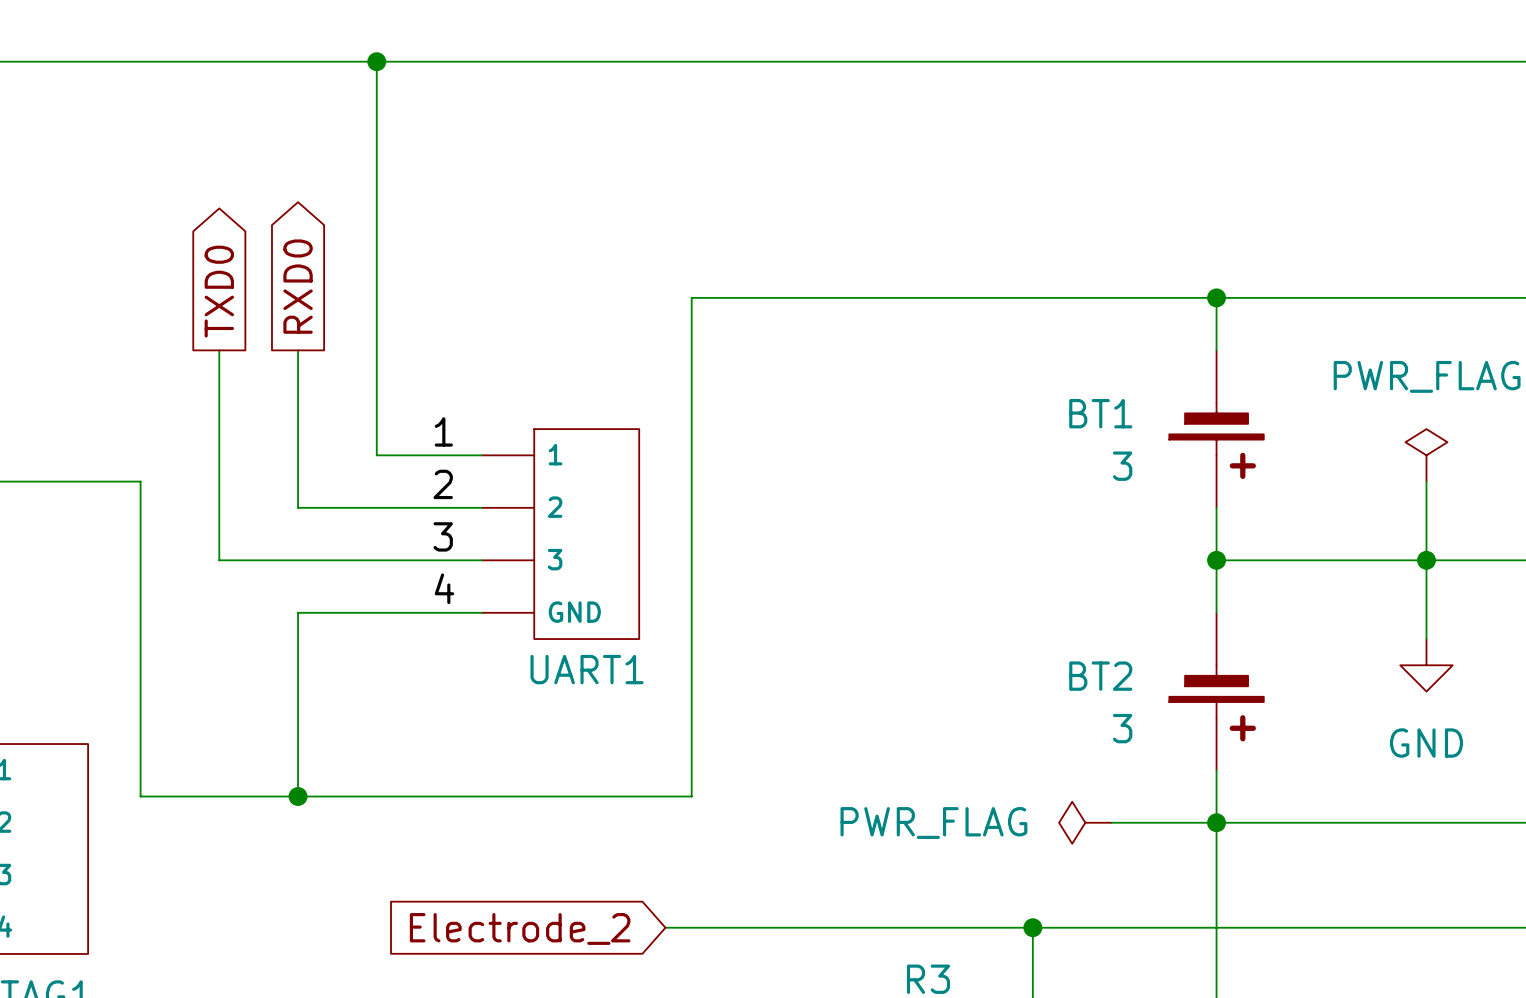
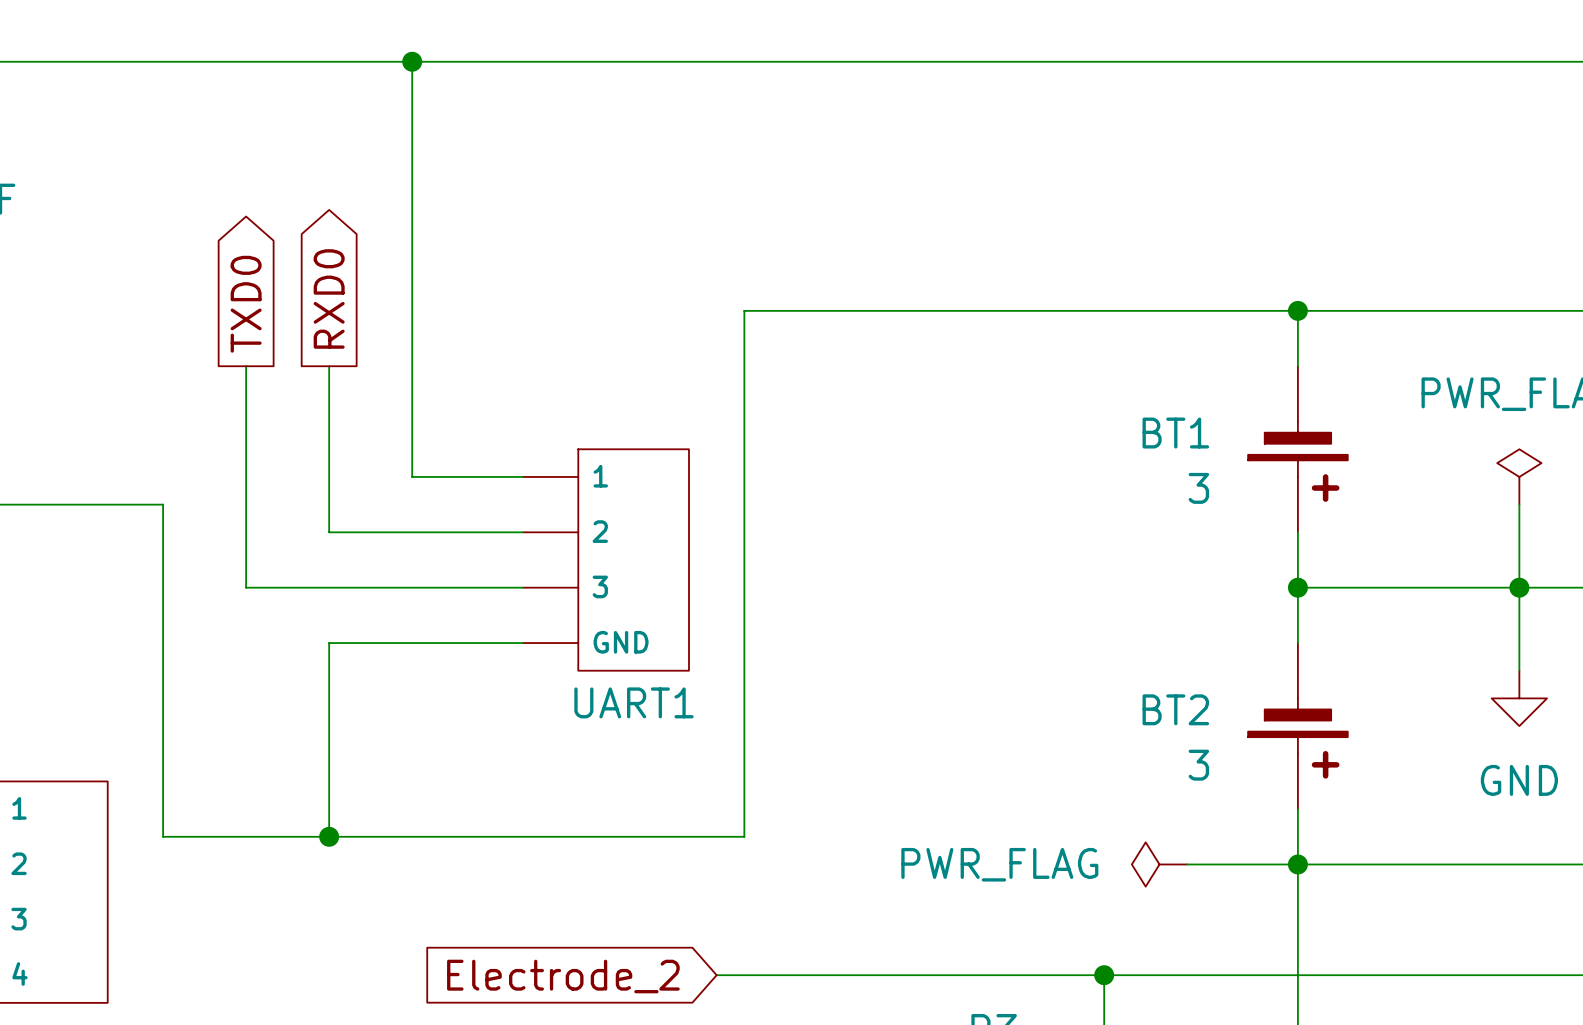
label: 1 (443, 431) -> none
label: 2 (443, 484) -> none
label: 3 (443, 536) -> none
label: 4 (444, 588) -> none

